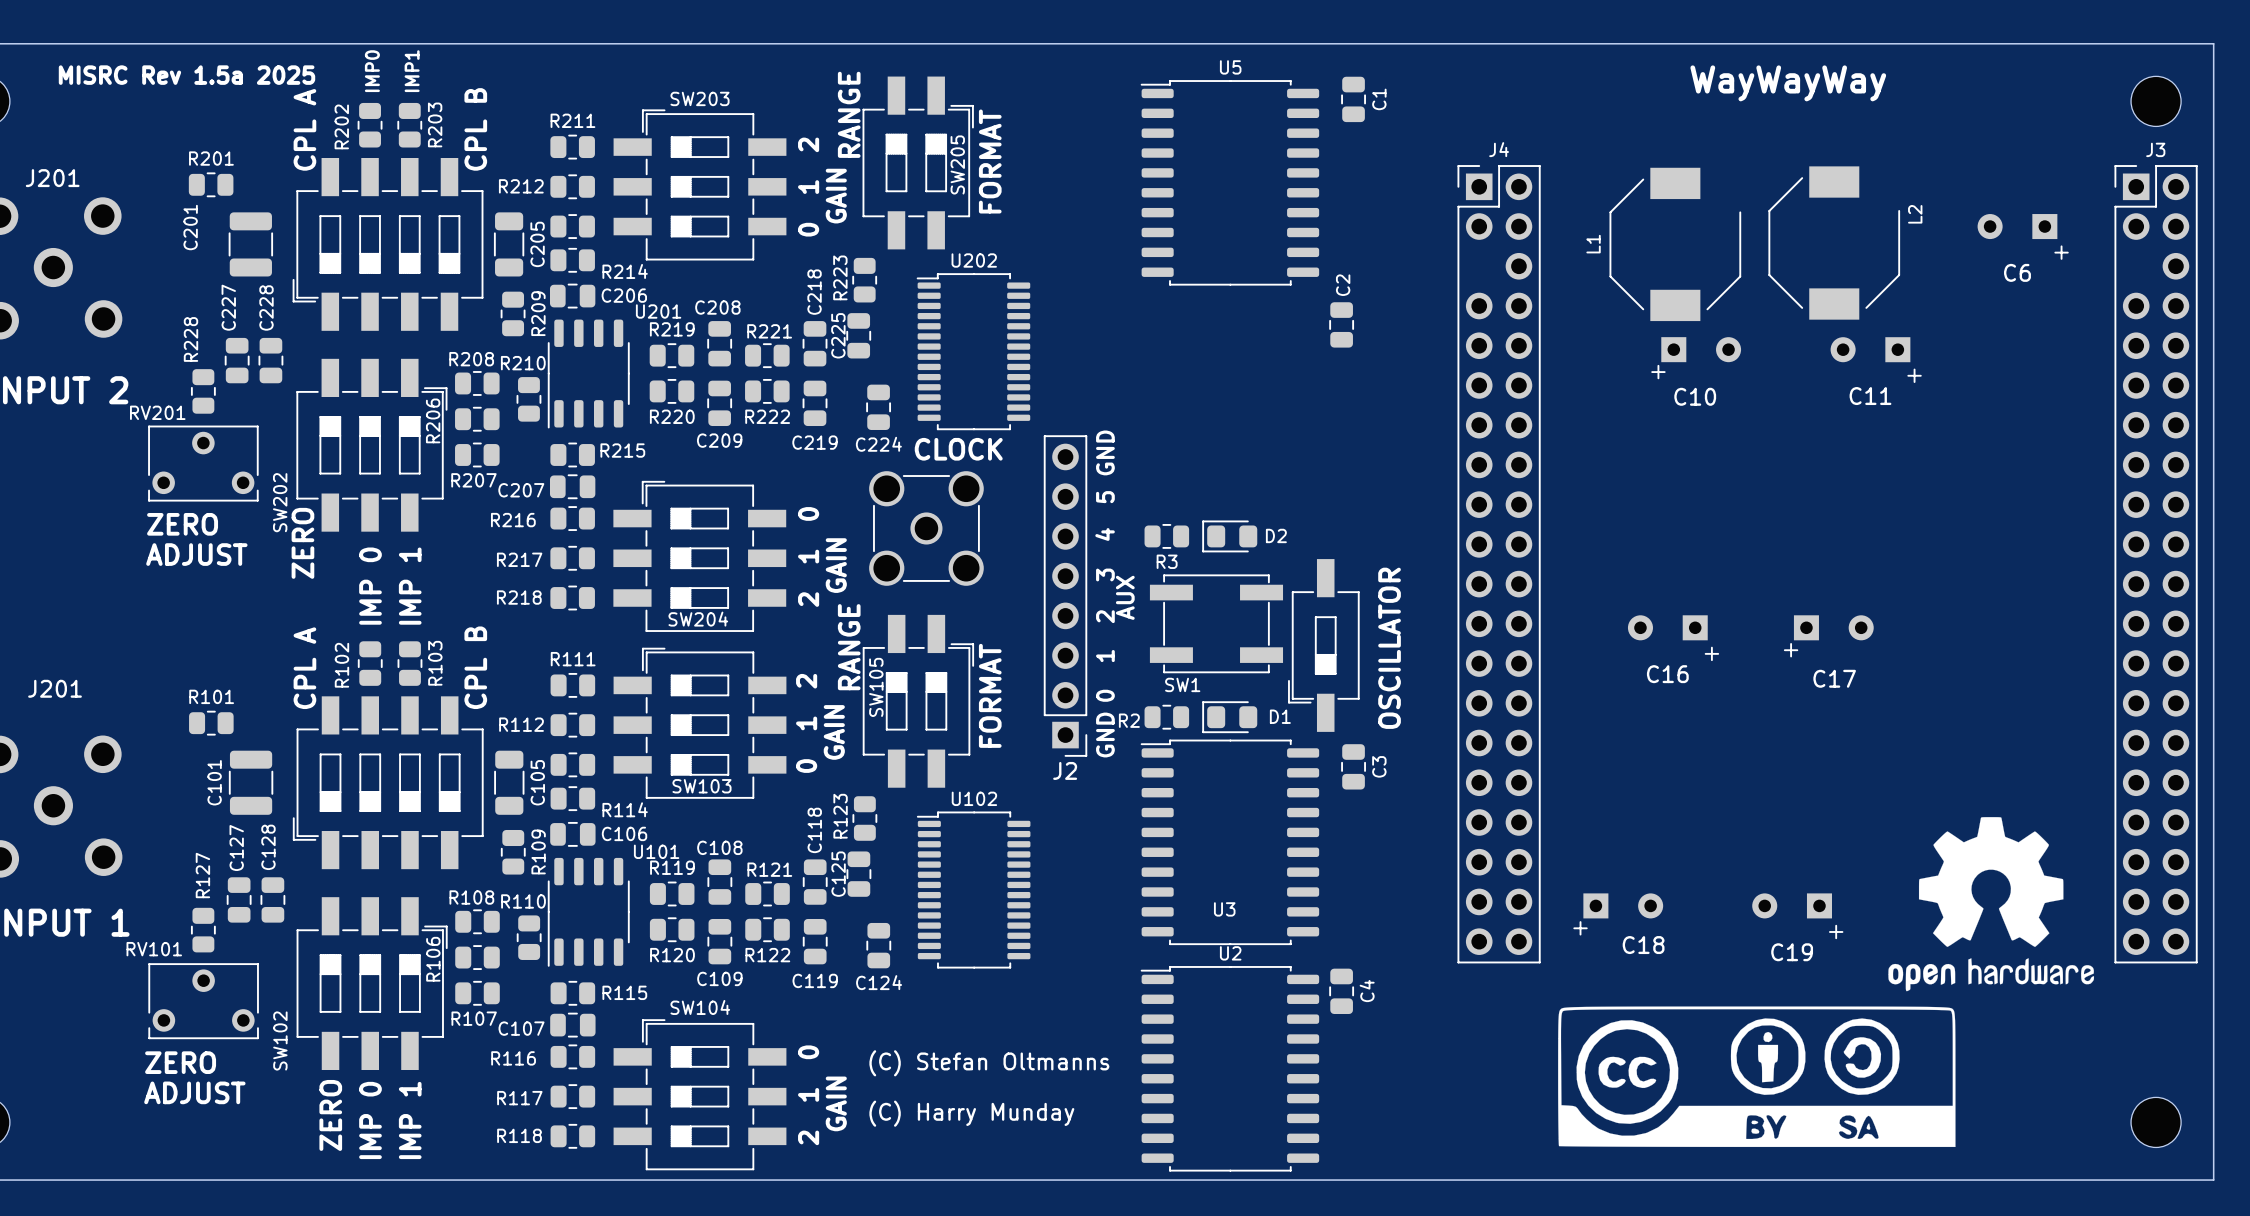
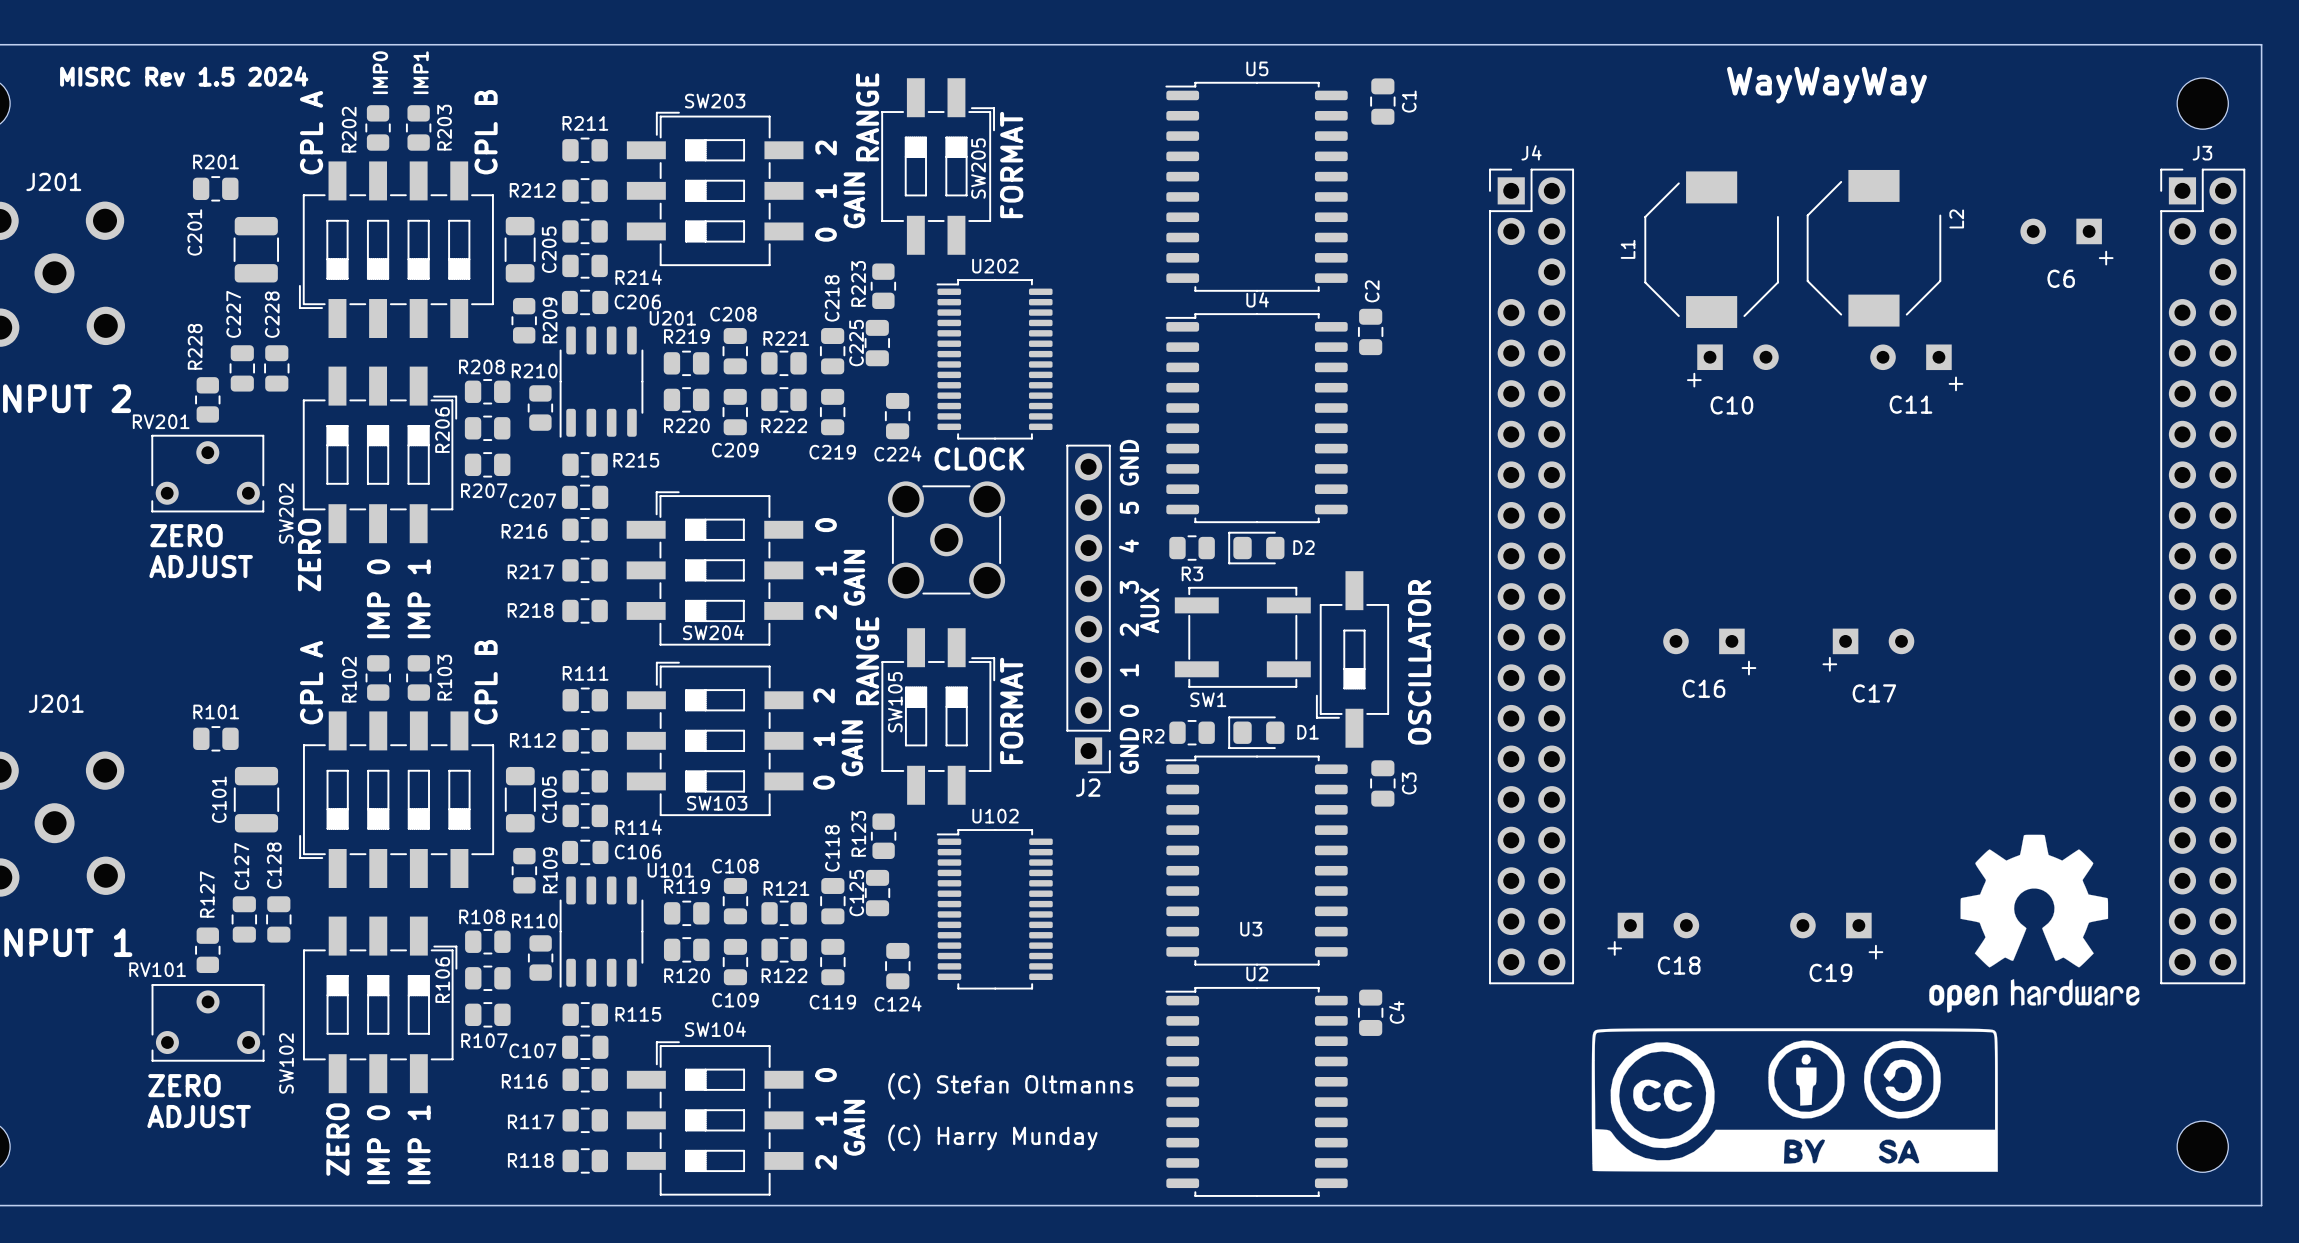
text: MISRC Rev 1.5a 2025 (186, 75) -> MISRC Rev 1.5 2024 (184, 76)
U4: none -> (1256, 418)

